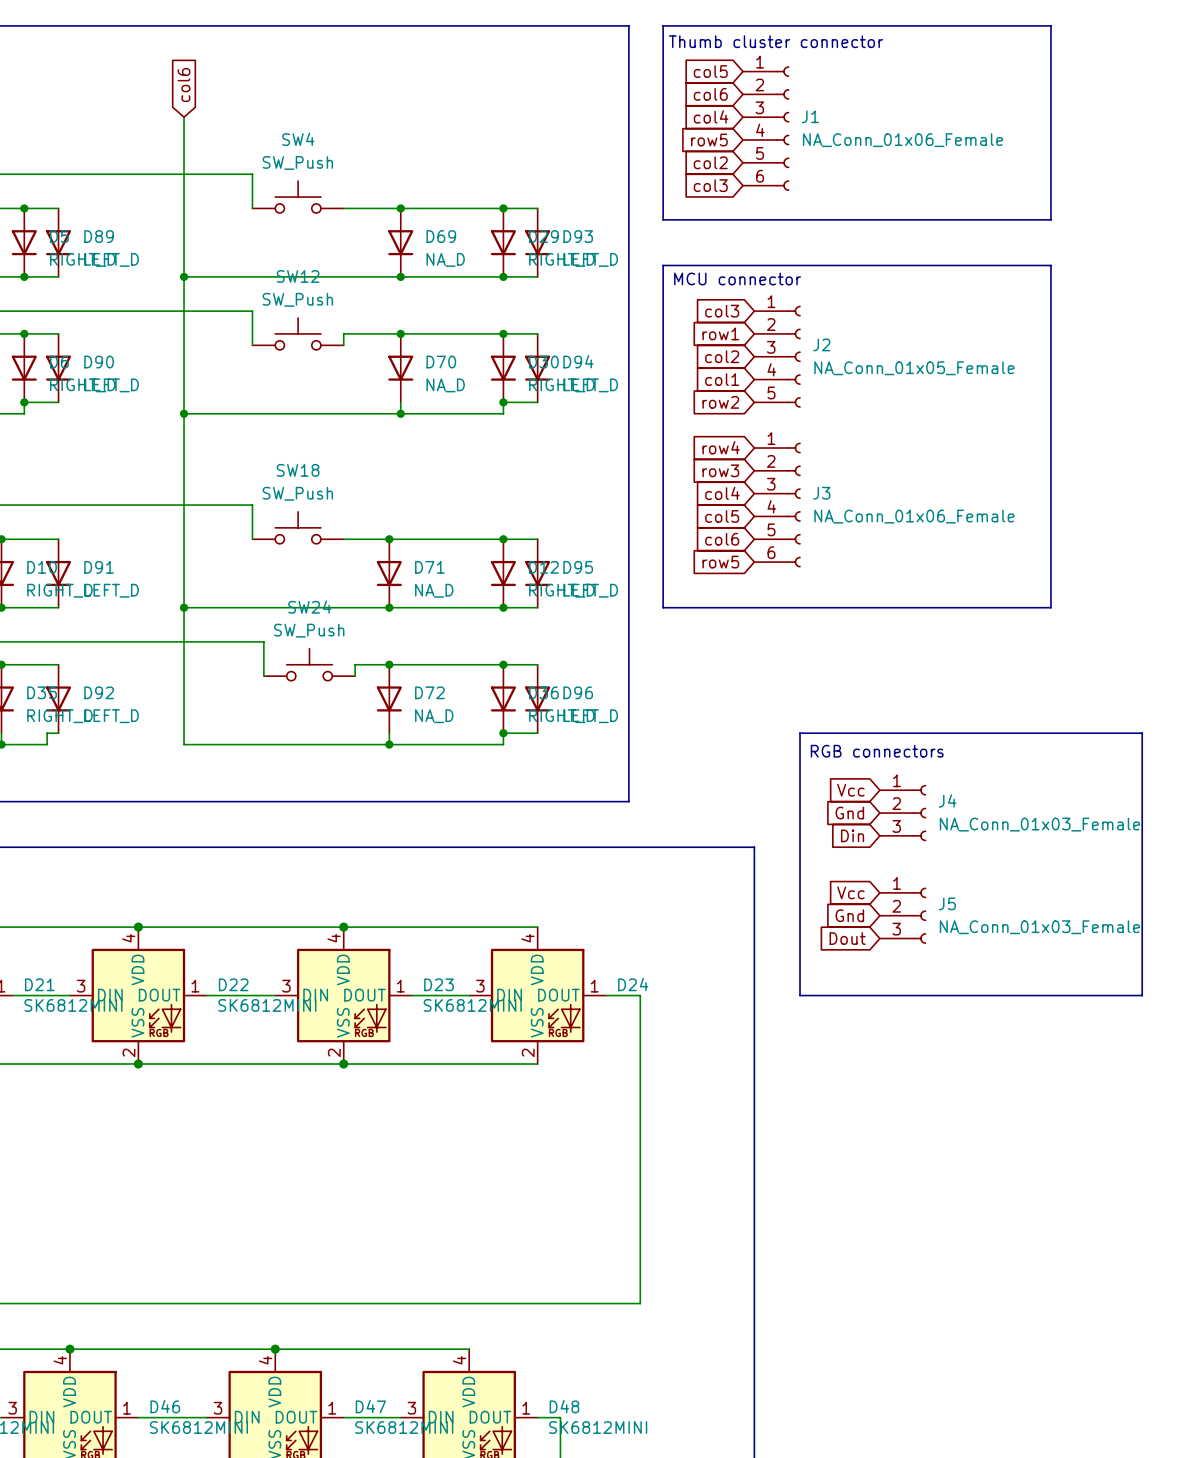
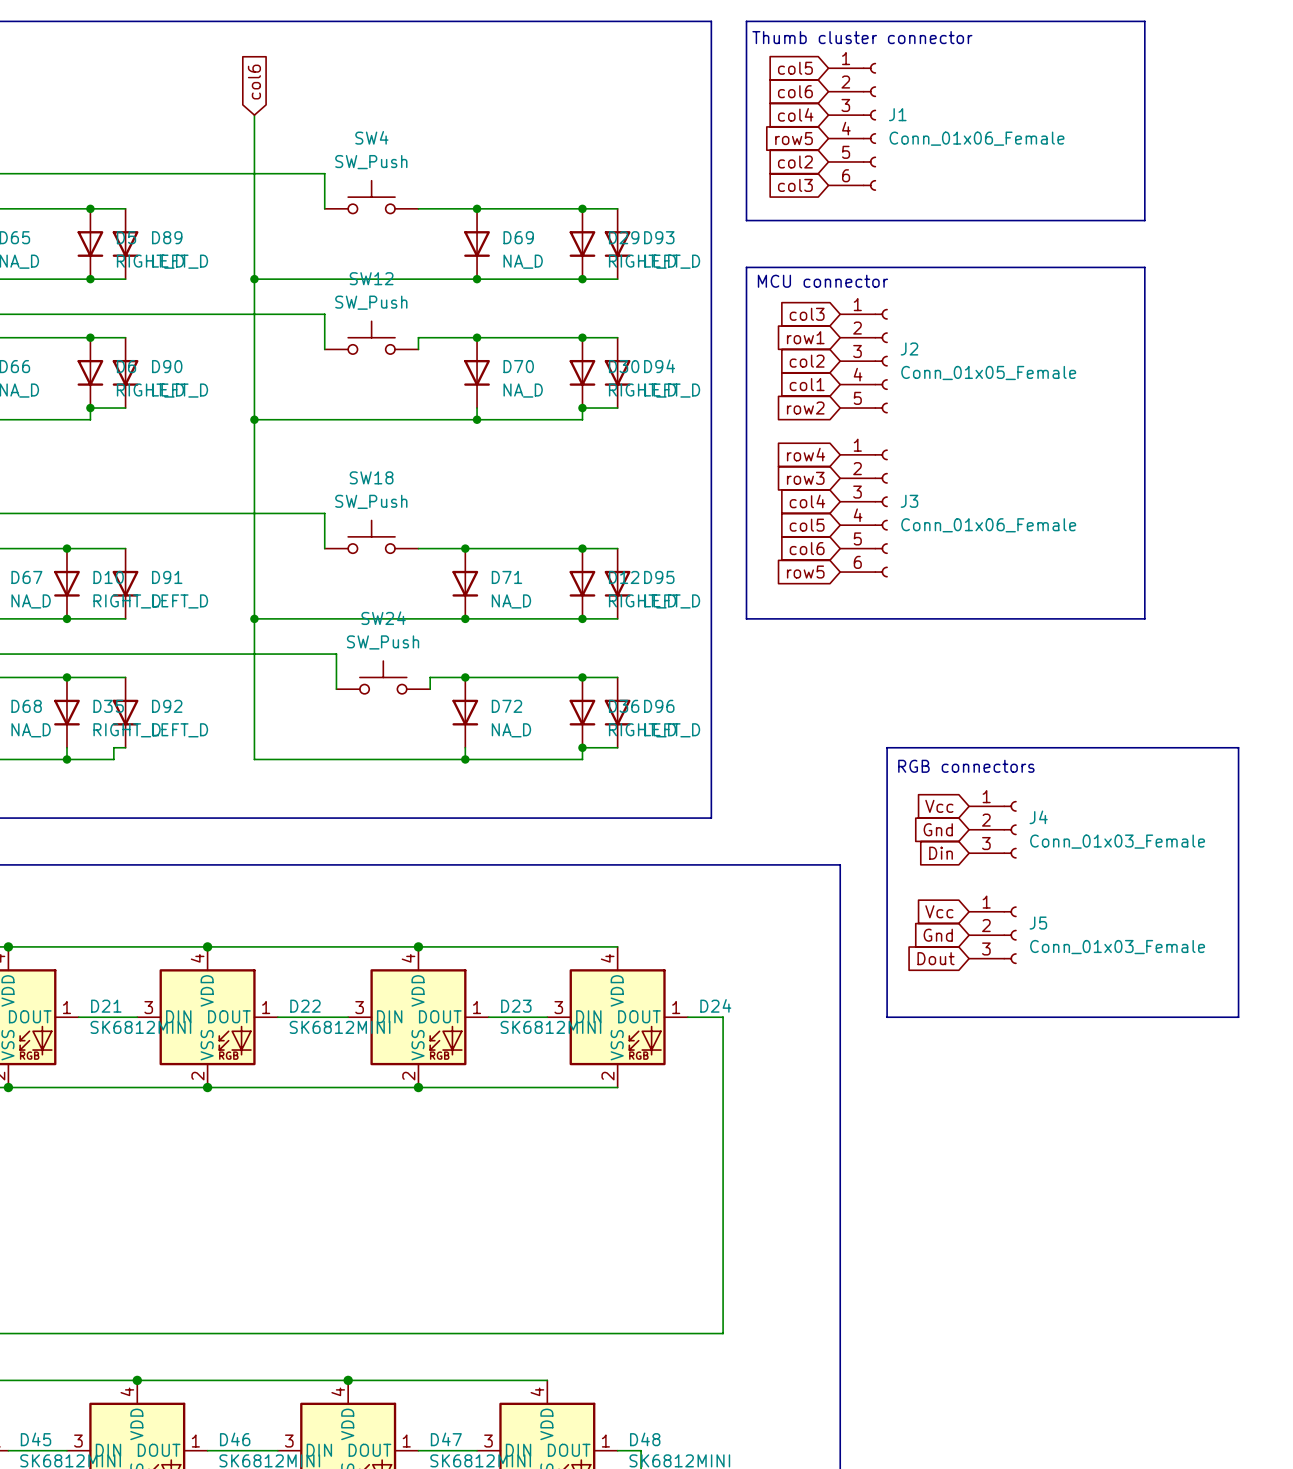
J1 value: NA_Conn_01x06_Female (903, 140) -> Conn_01x06_Female (976, 138)
J2 value: NA_Conn_01x05_Female (914, 368) -> Conn_01x05_Female (988, 372)
J3 value: NA_Conn_01x06_Female (914, 516) -> Conn_01x06_Female (988, 525)
J4 value: NA_Conn_01x03_Female (1039, 824) -> Conn_01x03_Female (1117, 841)
J5 value: NA_Conn_01x03_Female (1039, 927) -> Conn_01x03_Female (1117, 947)

